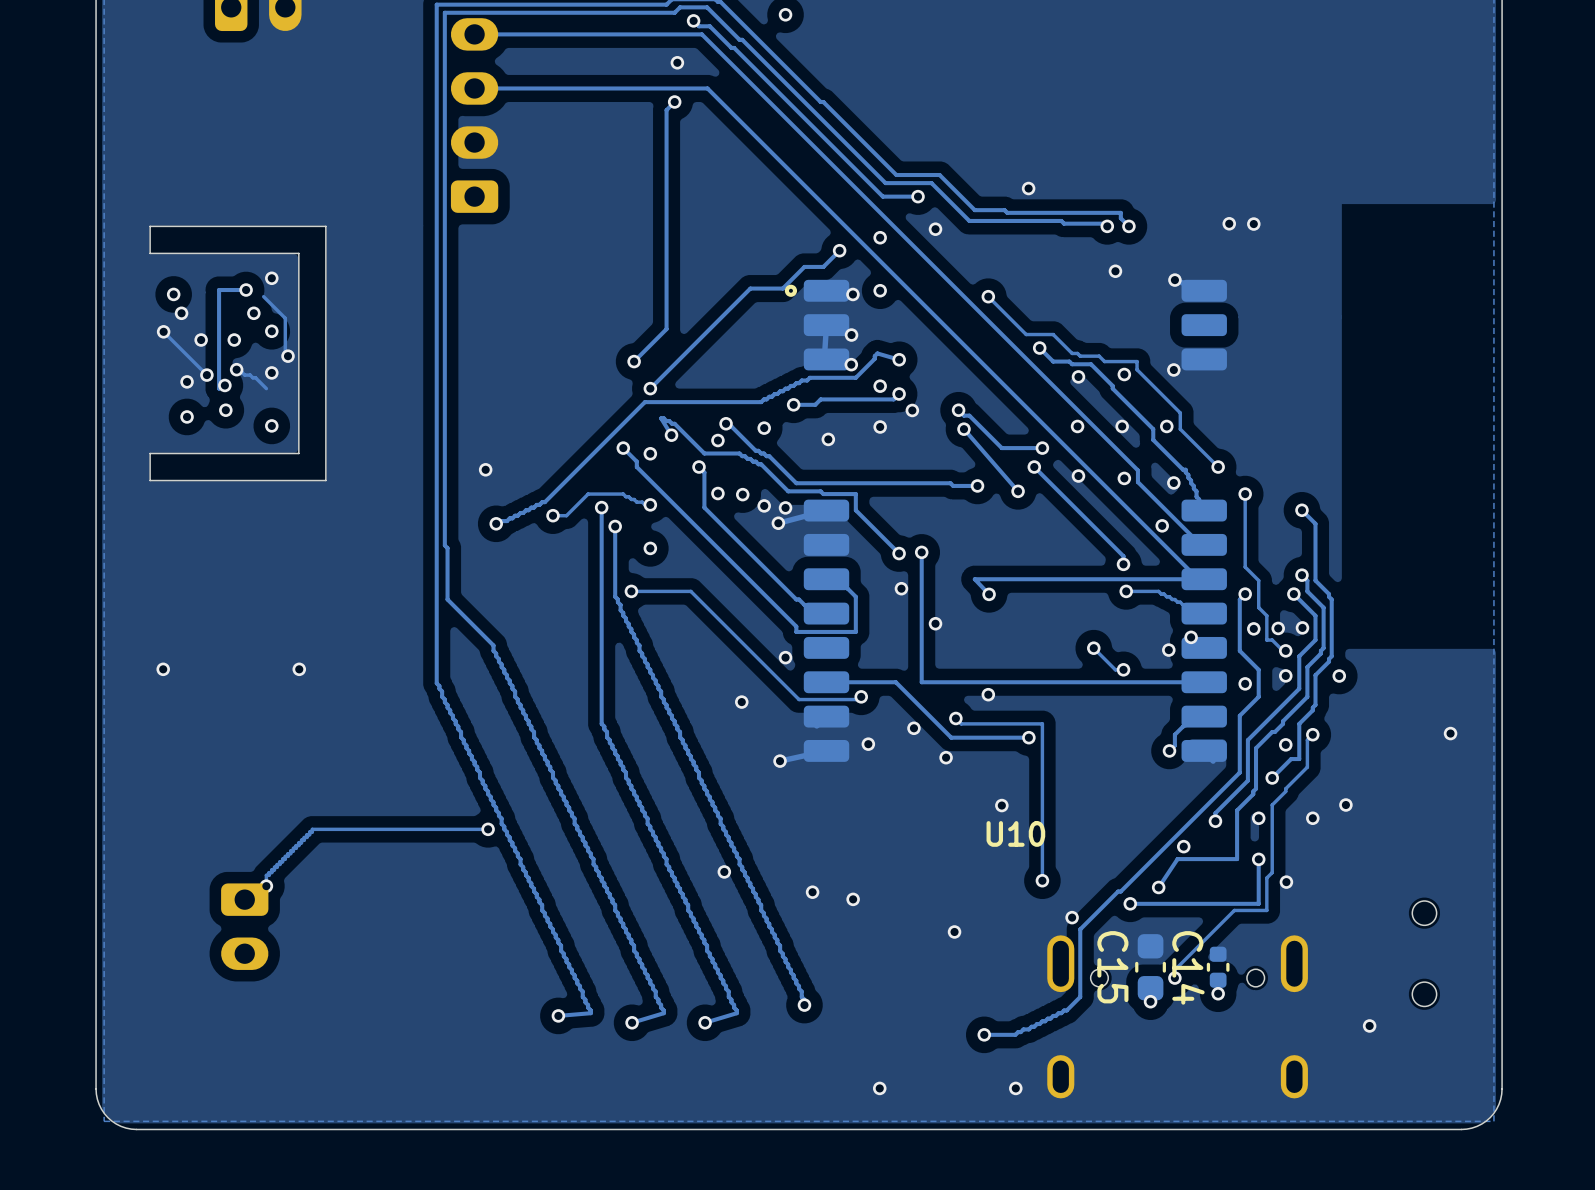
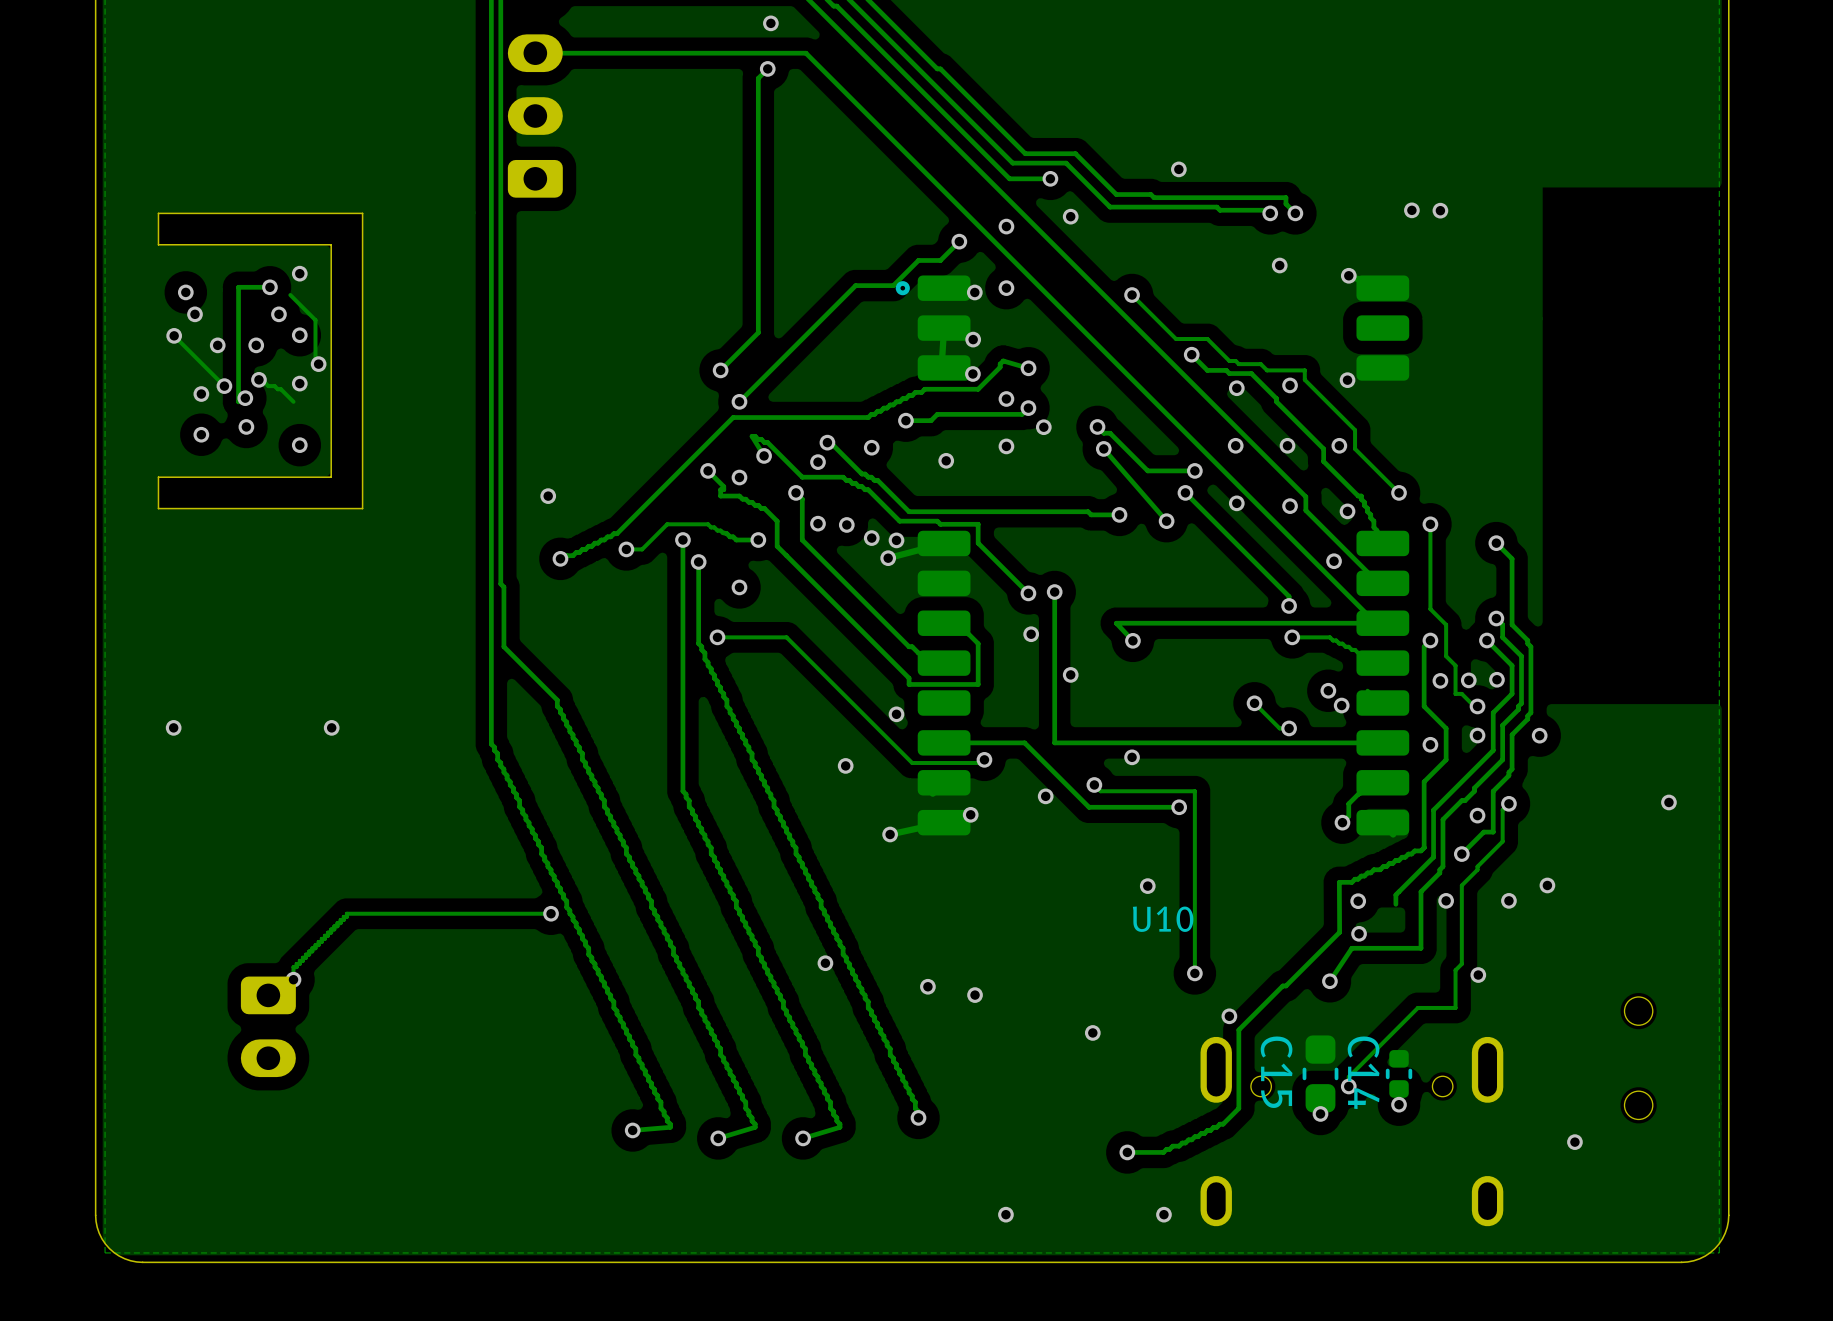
track: (636, 464) (636, 467) (682, 512) -> (723, 489) (720, 489) (720, 496) (739, 496) (764, 508) (777, 521) (777, 546)
track: (635, 501) (650, 504) -> (722, 532) (736, 540) (758, 540)
via position: (650, 504) -> (758, 540)
via position: (1191, 637) -> (1328, 690)
via position: (868, 744) -> (970, 814)
via: (946, 757) -> none
track: (1237, 775) (1167, 845) -> (1421, 850) (1414, 850) (1351, 882) (1339, 882) (1339, 932)
via position: (1215, 821) -> (1358, 901)
track: (1258, 859) (1258, 903) (1130, 903) -> none
via: (1258, 859) -> none
via: (1130, 903) -> none

